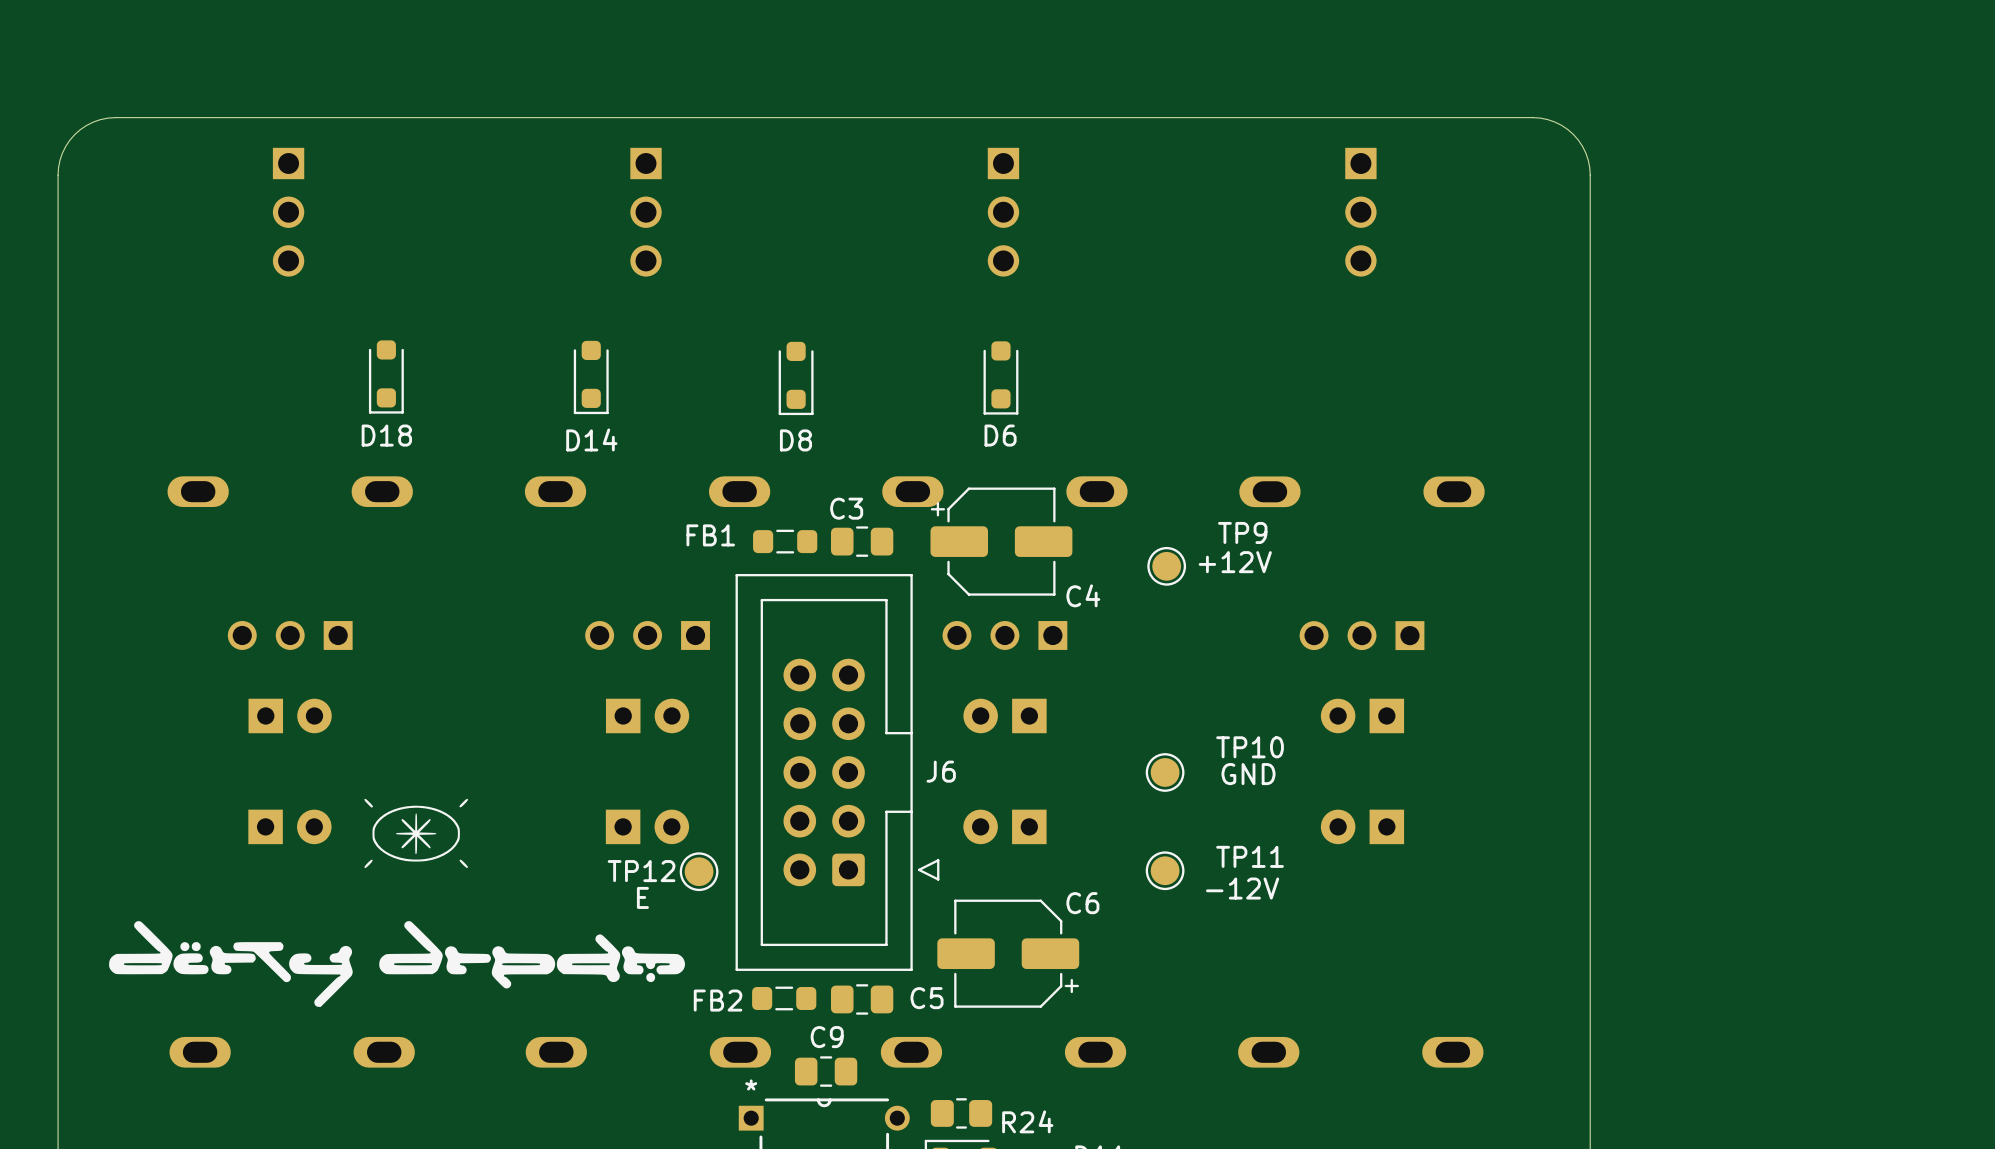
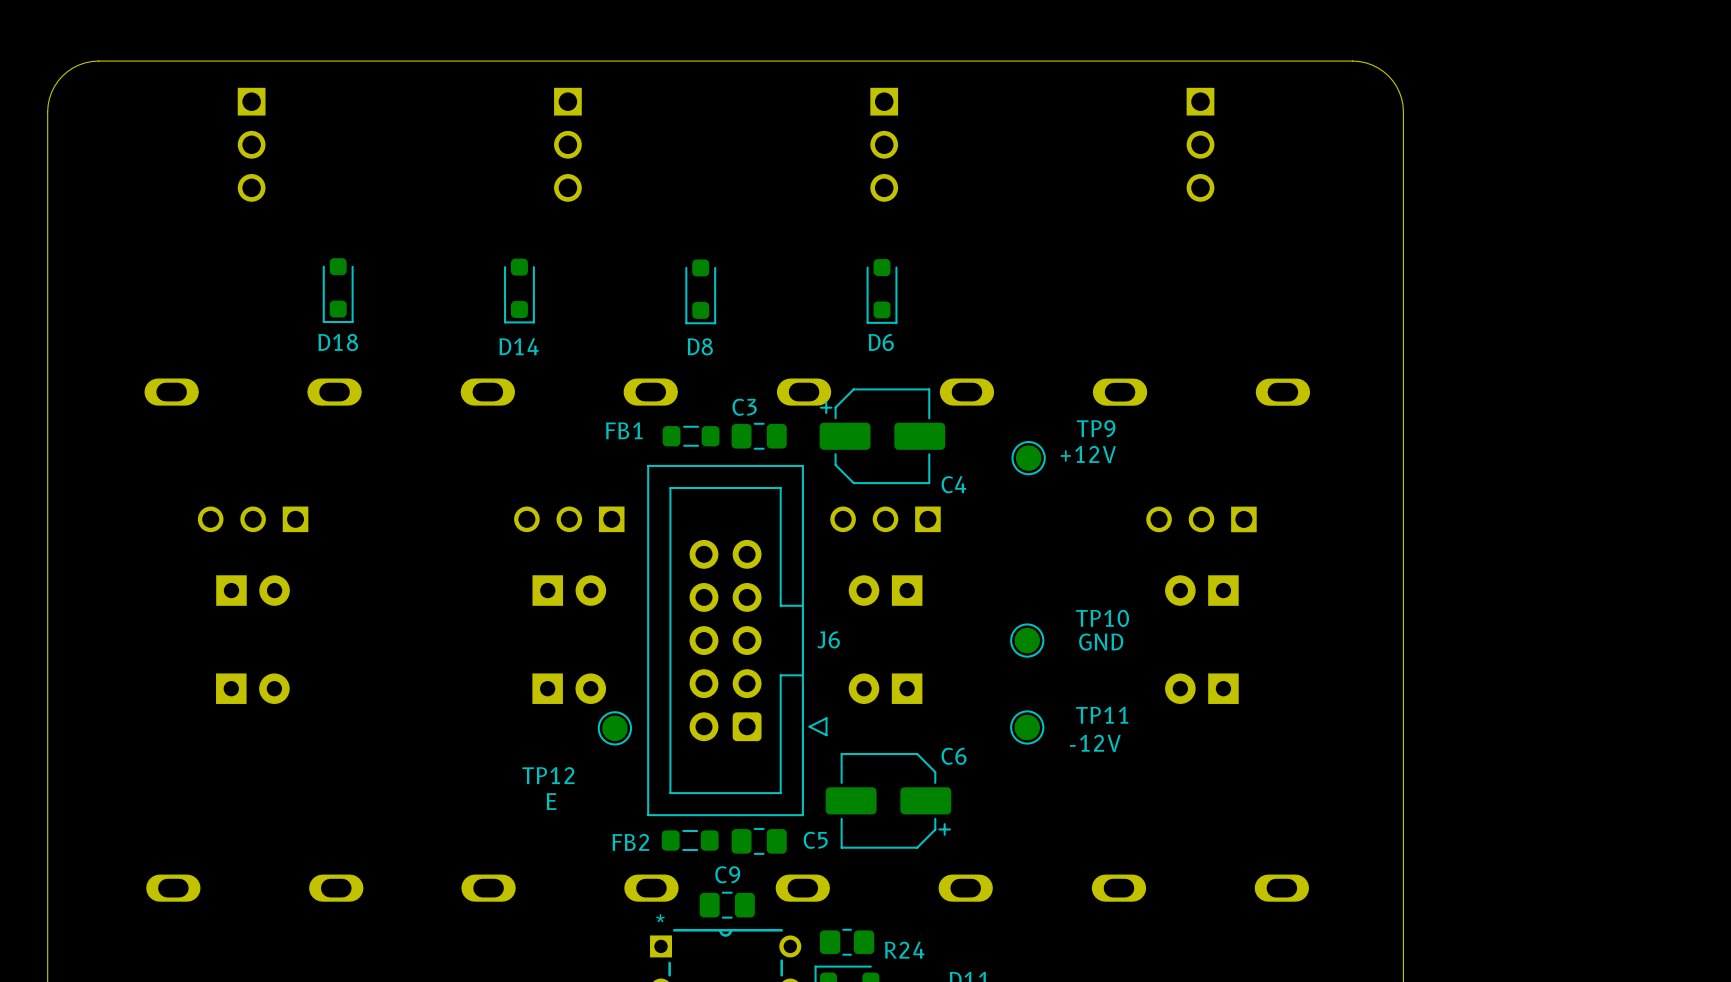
drawing: [364, 798, 469, 869] -> none
TP12 name position: TP12 (641, 871) -> TP12 (548, 775)
TP12 value position: E (642, 897) -> E (551, 801)
drawing: [109, 921, 686, 1007] -> none

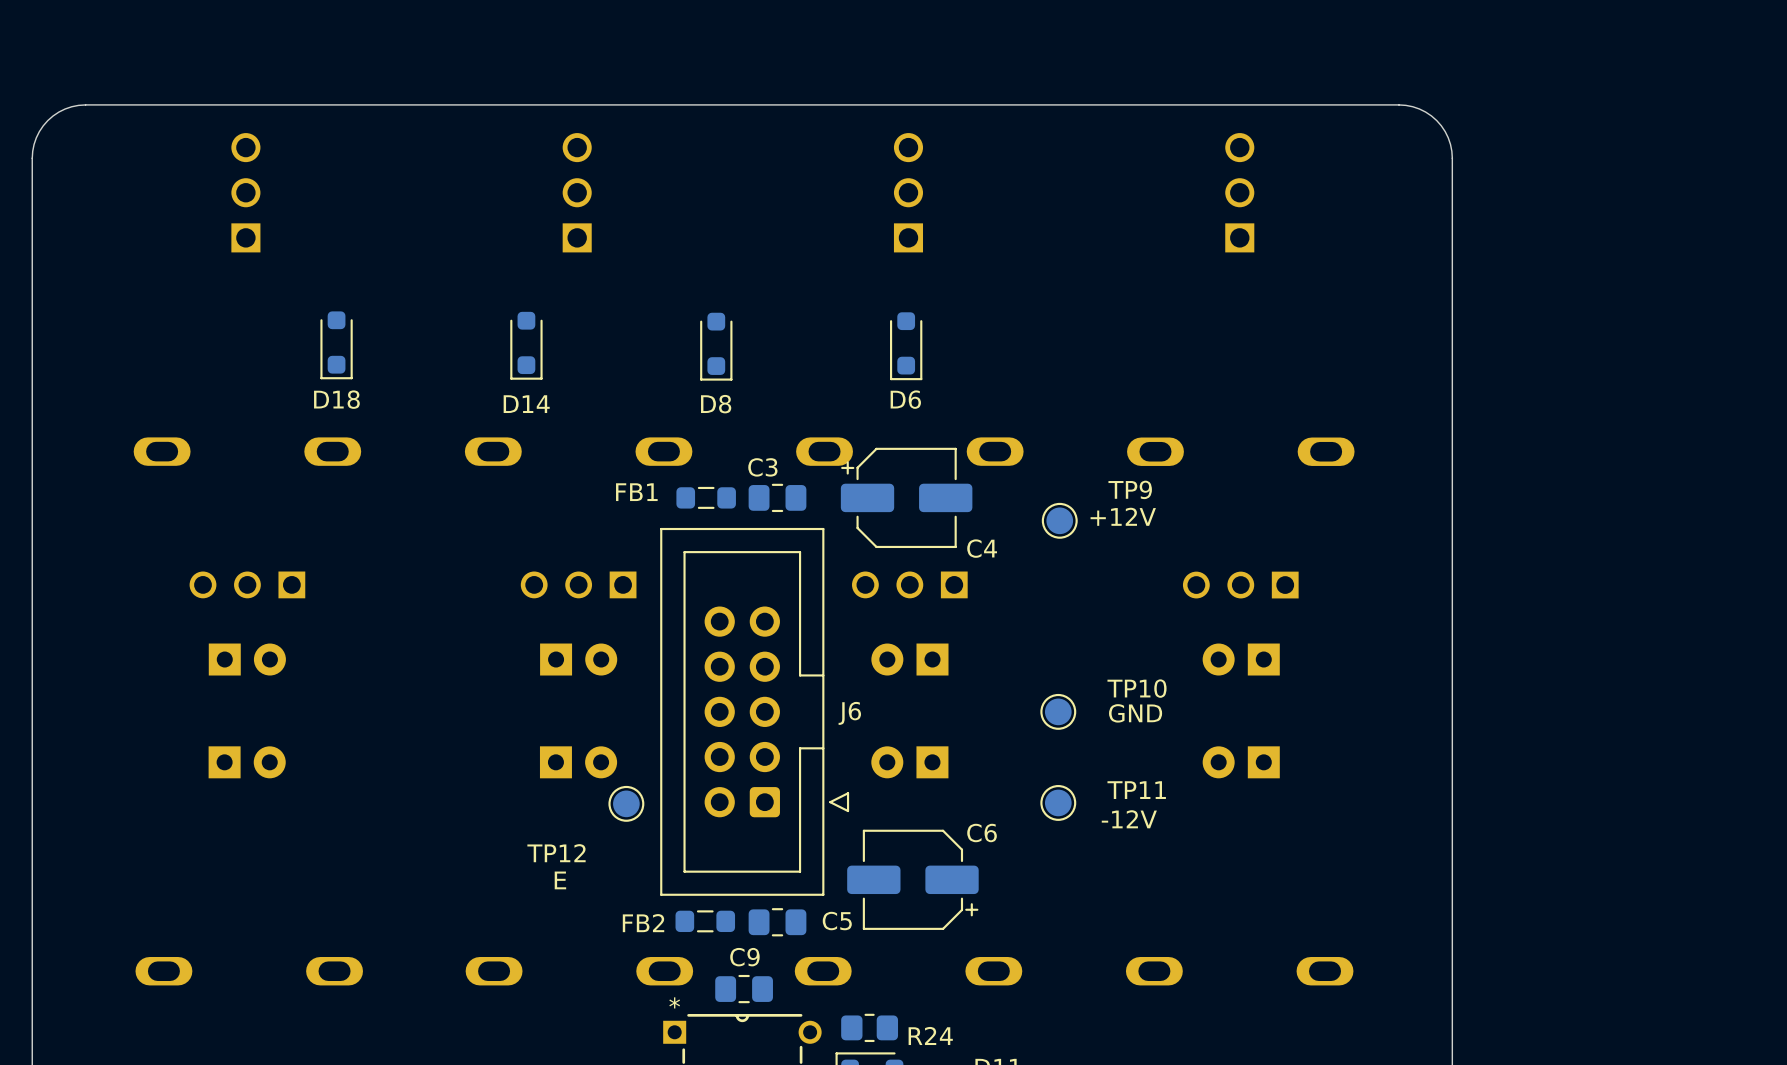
part rotation: 0° (251, 144) -> 180° (245, 192)
part rotation: 0° (567, 144) -> 180° (577, 192)
part rotation: 0° (884, 144) -> 180° (908, 192)
part rotation: 0° (1200, 144) -> 180° (1239, 192)

